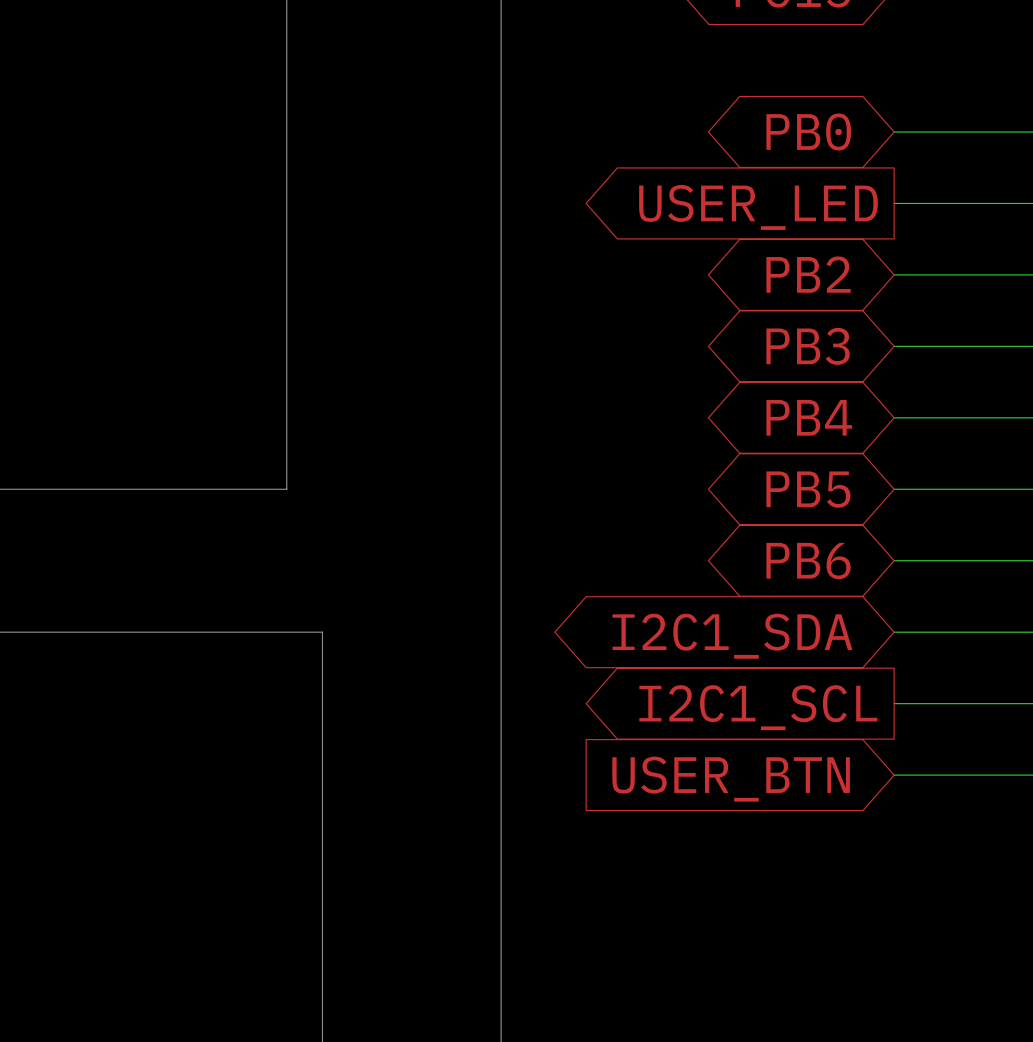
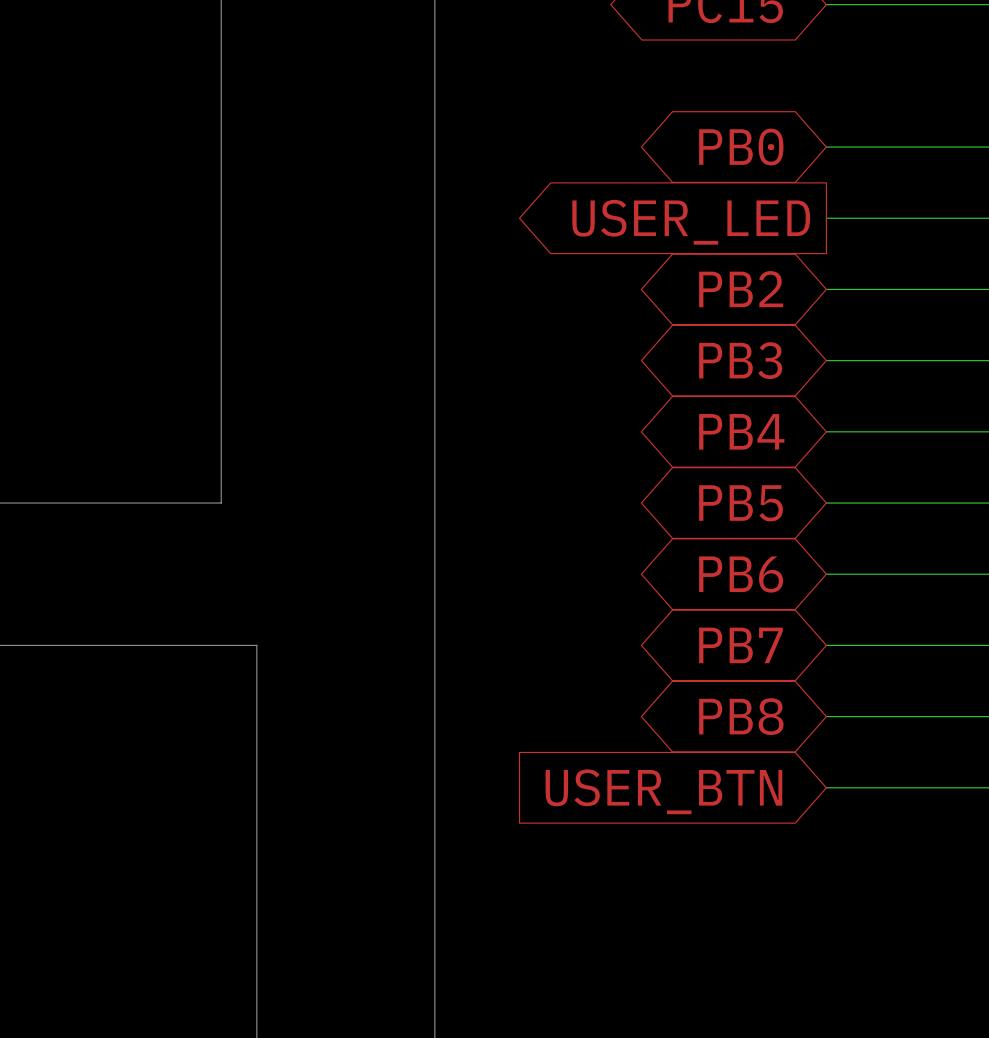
global label: I2C1_SDA (732, 636) -> PB7 (740, 645)
global label shape: output (758, 707) -> bidirectional (741, 716)
global label: I2C1_SCL (758, 707) -> PB8 (741, 716)

